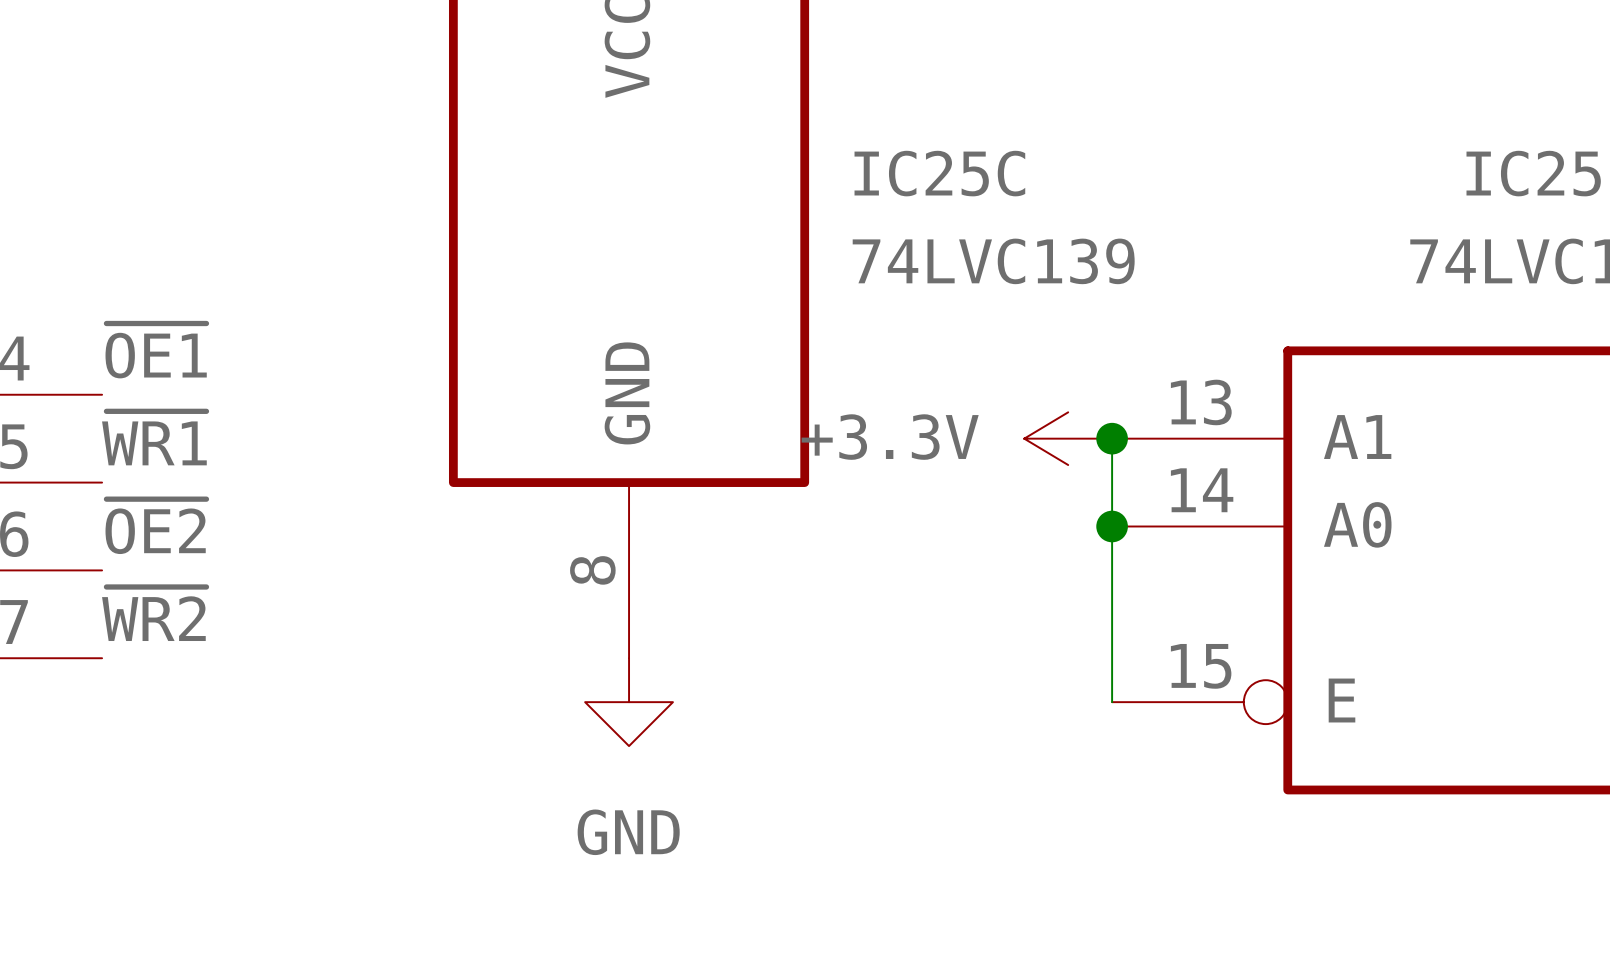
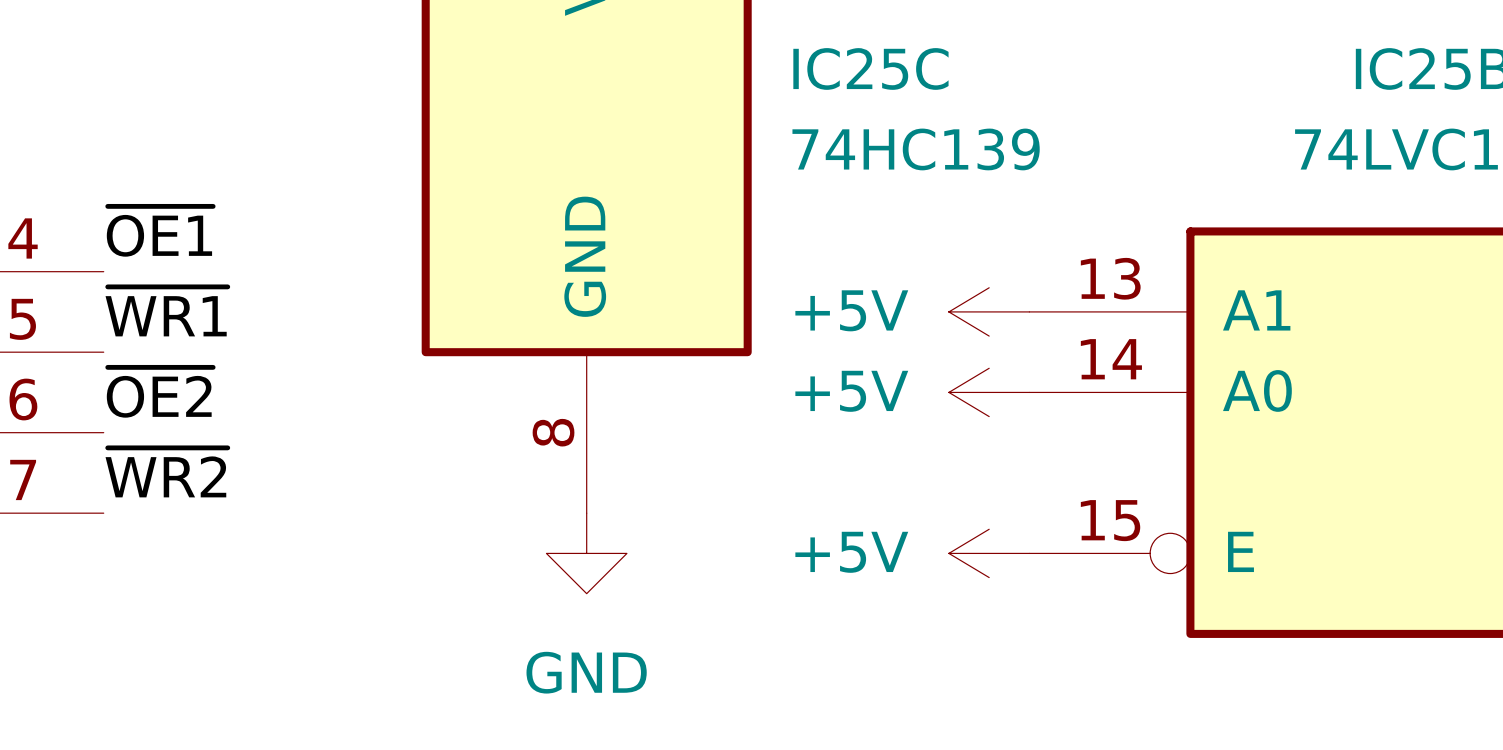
IC25C value: 74LVC139 (993, 261) -> 74HC139 (916, 149)
power symbol: +3.3V (1068, 438) -> +5V (989, 311)
wire: (1112, 438) (1112, 702) -> none
junction: (1112, 438) -> none
power symbol: none -> +5V (989, 392)
junction: (1112, 526) -> none
power symbol: none -> +5V (989, 553)

